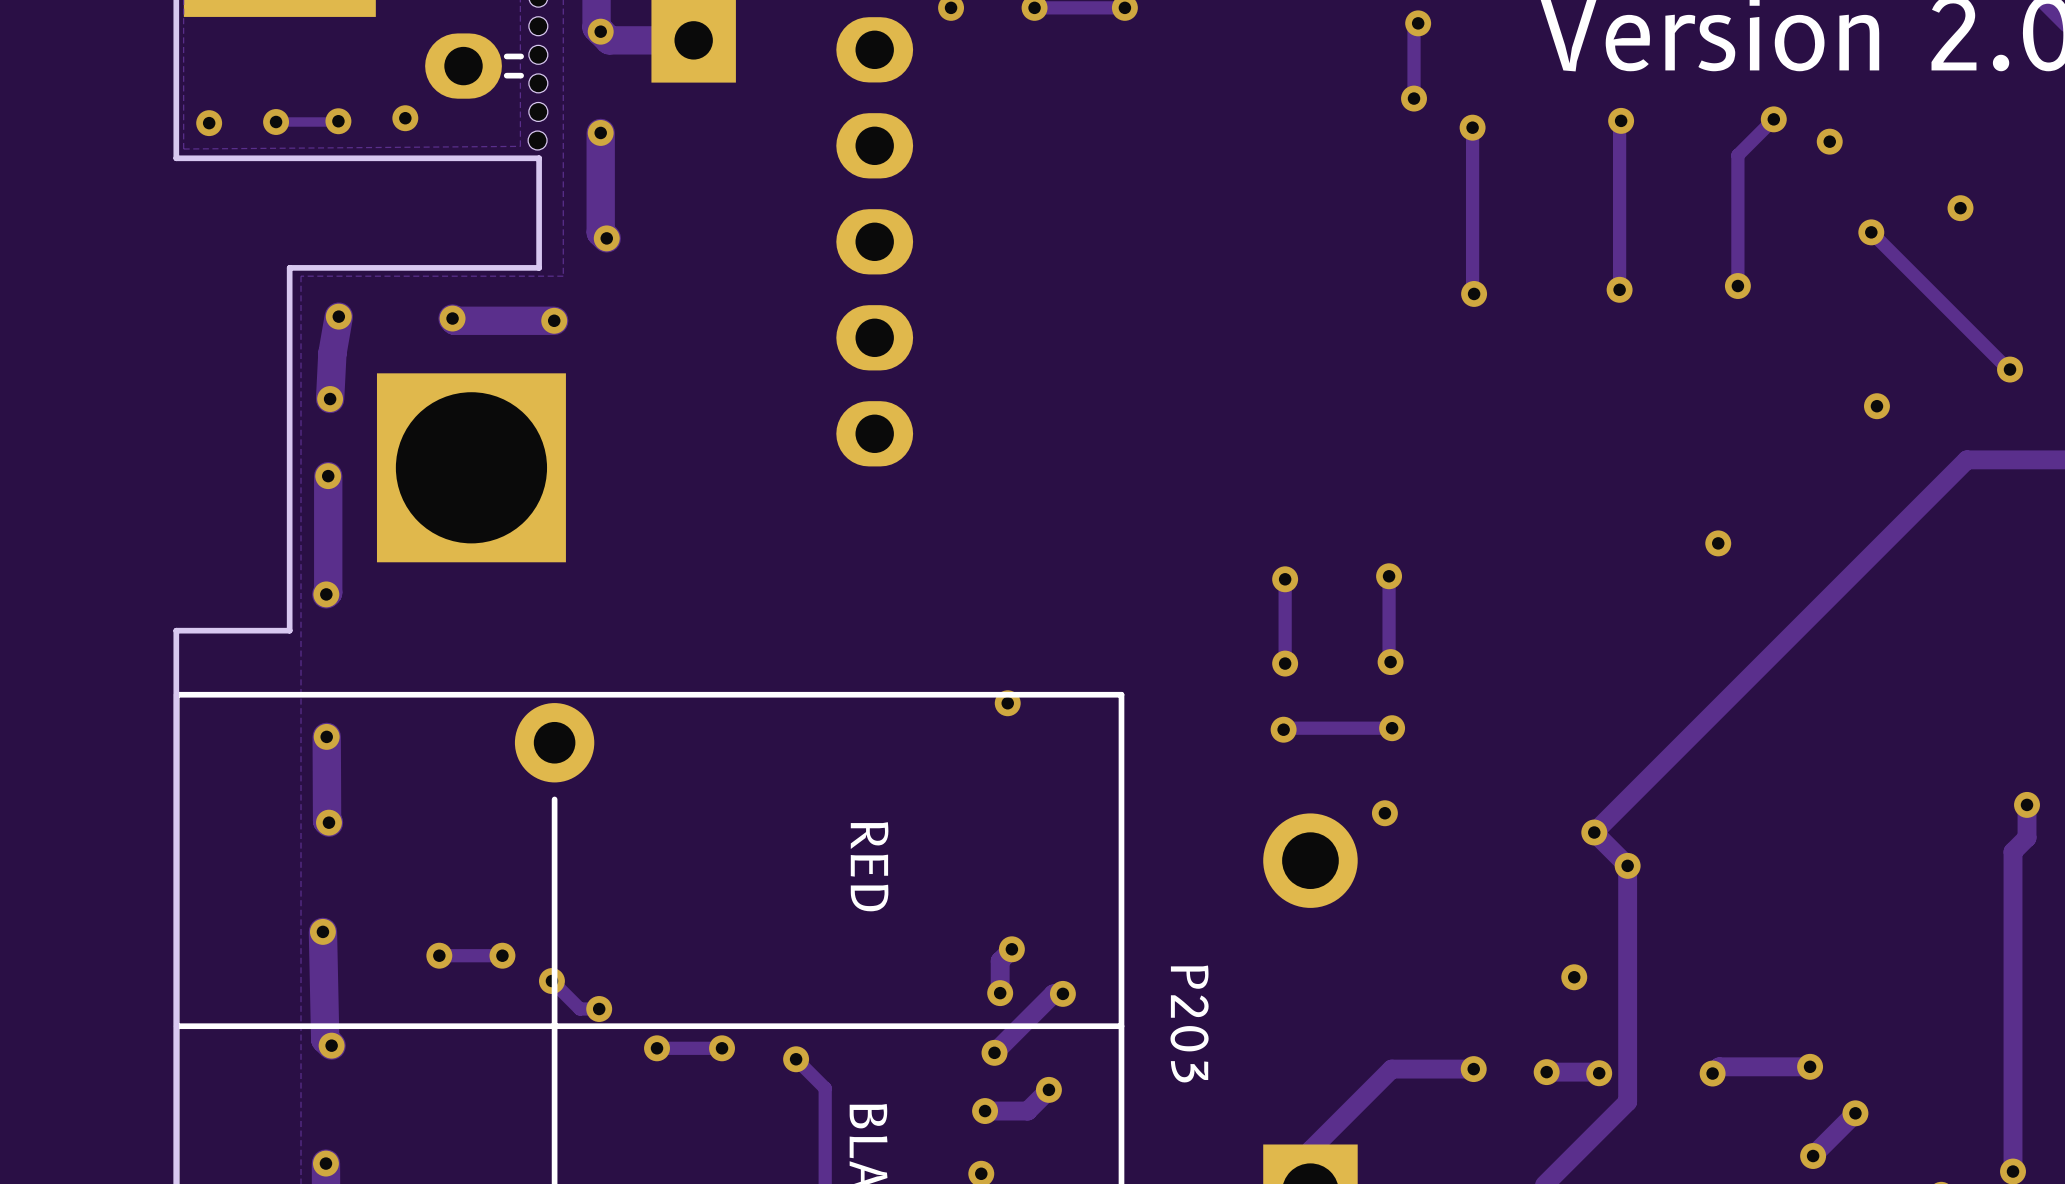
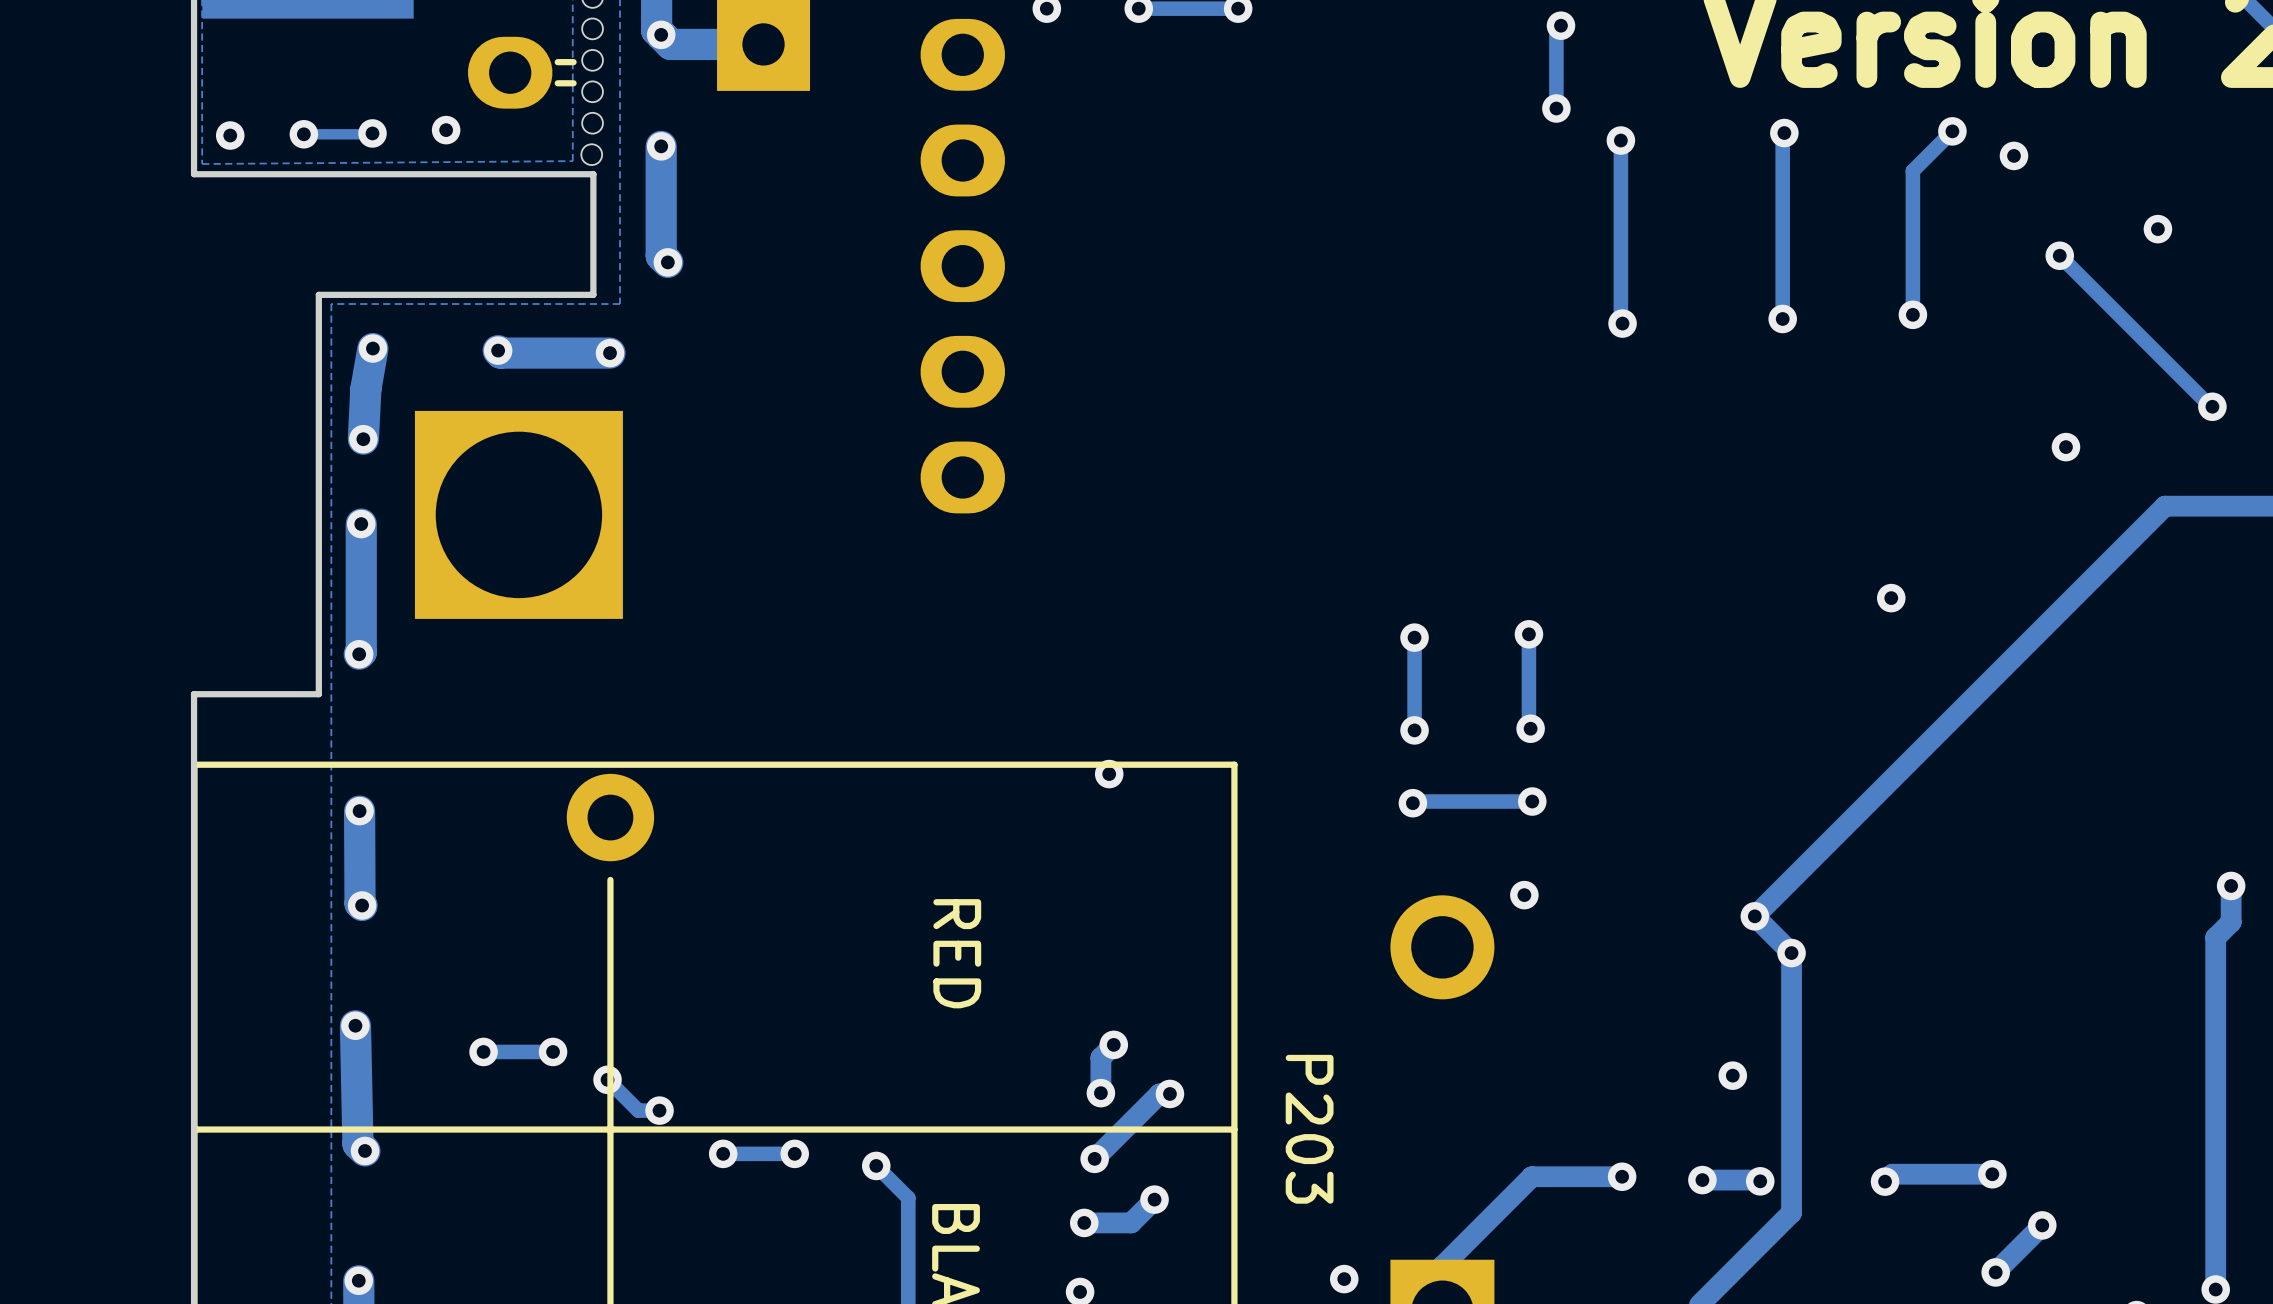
via: none -> (1344, 1279)

